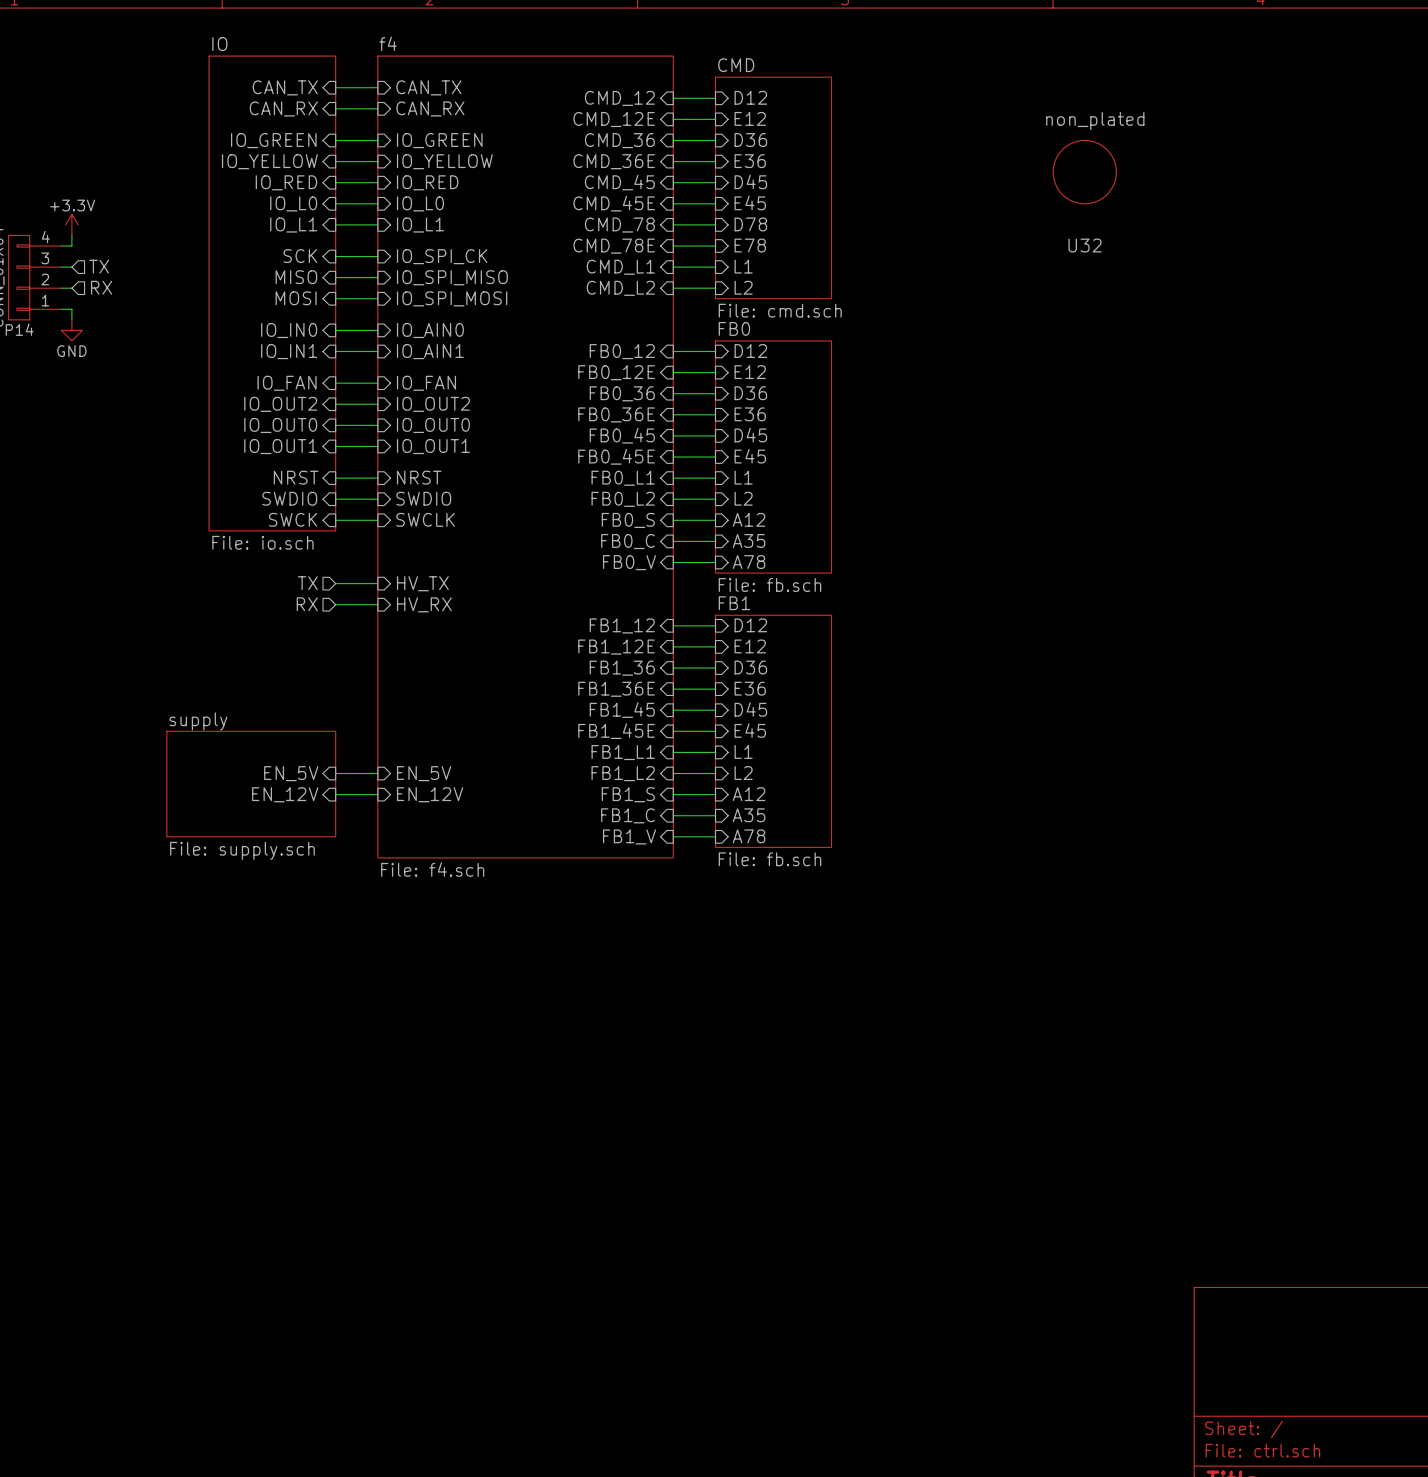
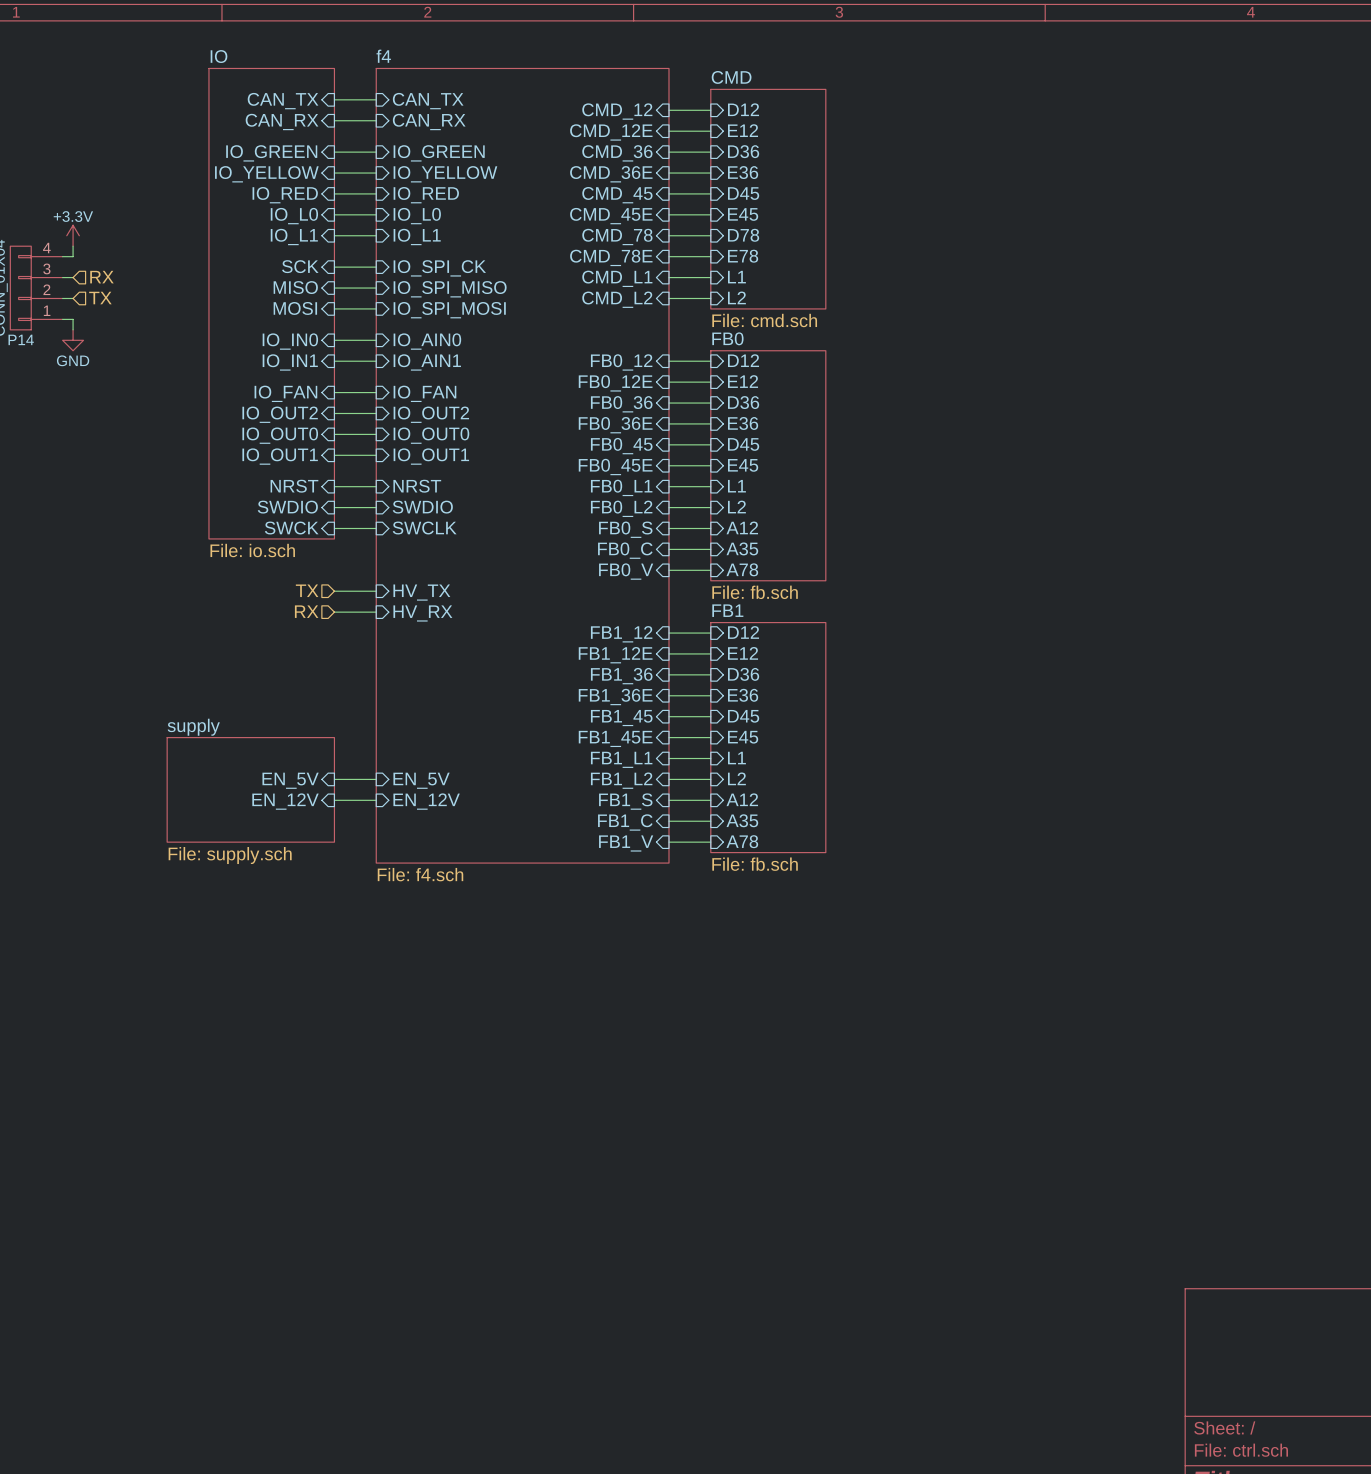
U32: non_plated (1084, 172) -> none
hierarchical label: TX (99, 266) -> RX (101, 277)
hierarchical label: RX (101, 287) -> TX (100, 298)

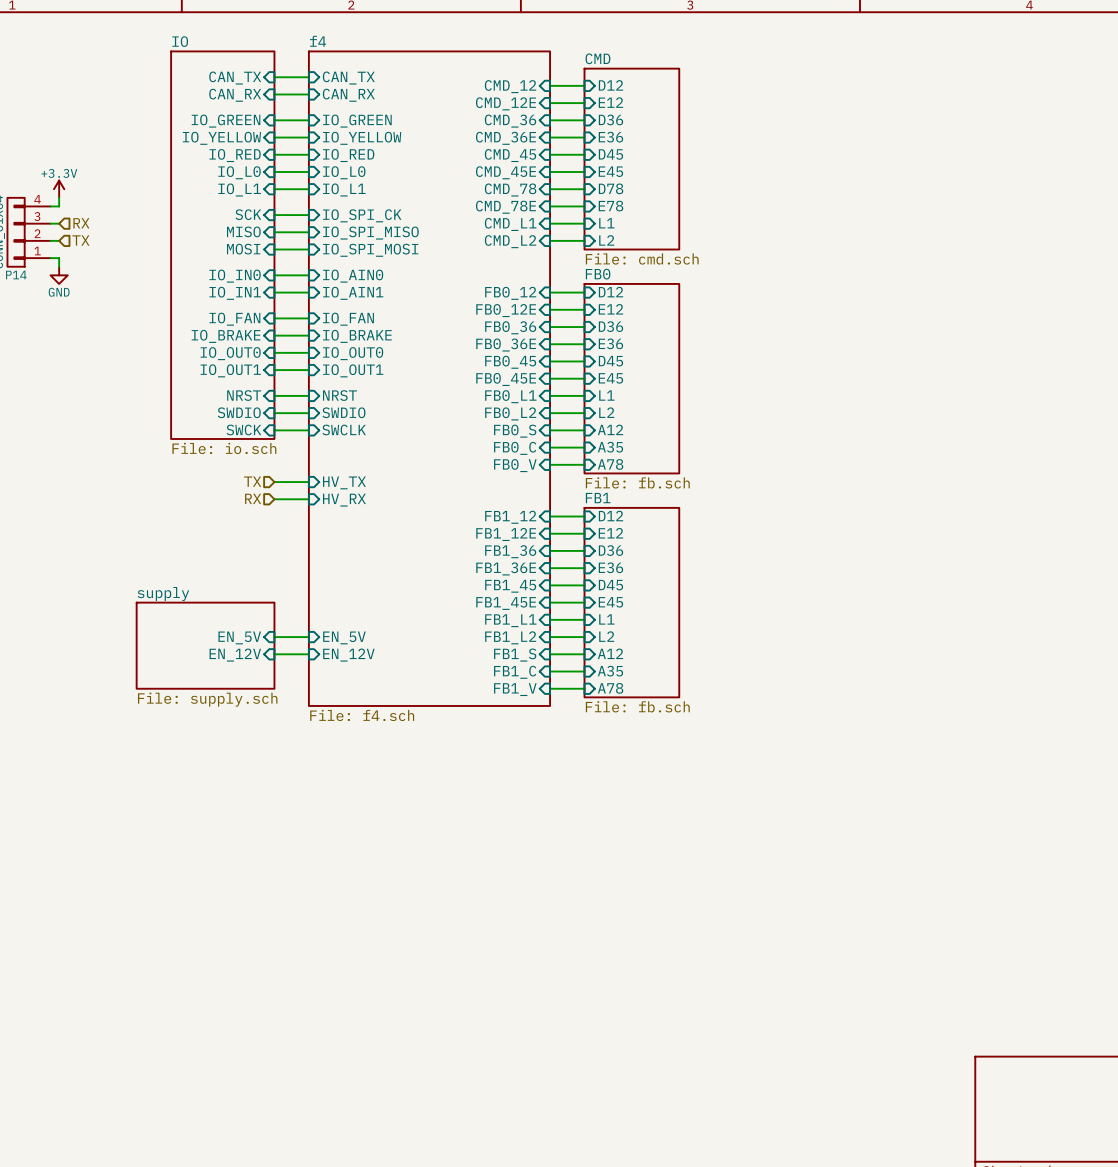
sheet pin: IO_OUT2 (280, 414) -> IO_BRAKE (226, 336)
sheet pin: IO_OUT2 (431, 414) -> IO_BRAKE (357, 336)

